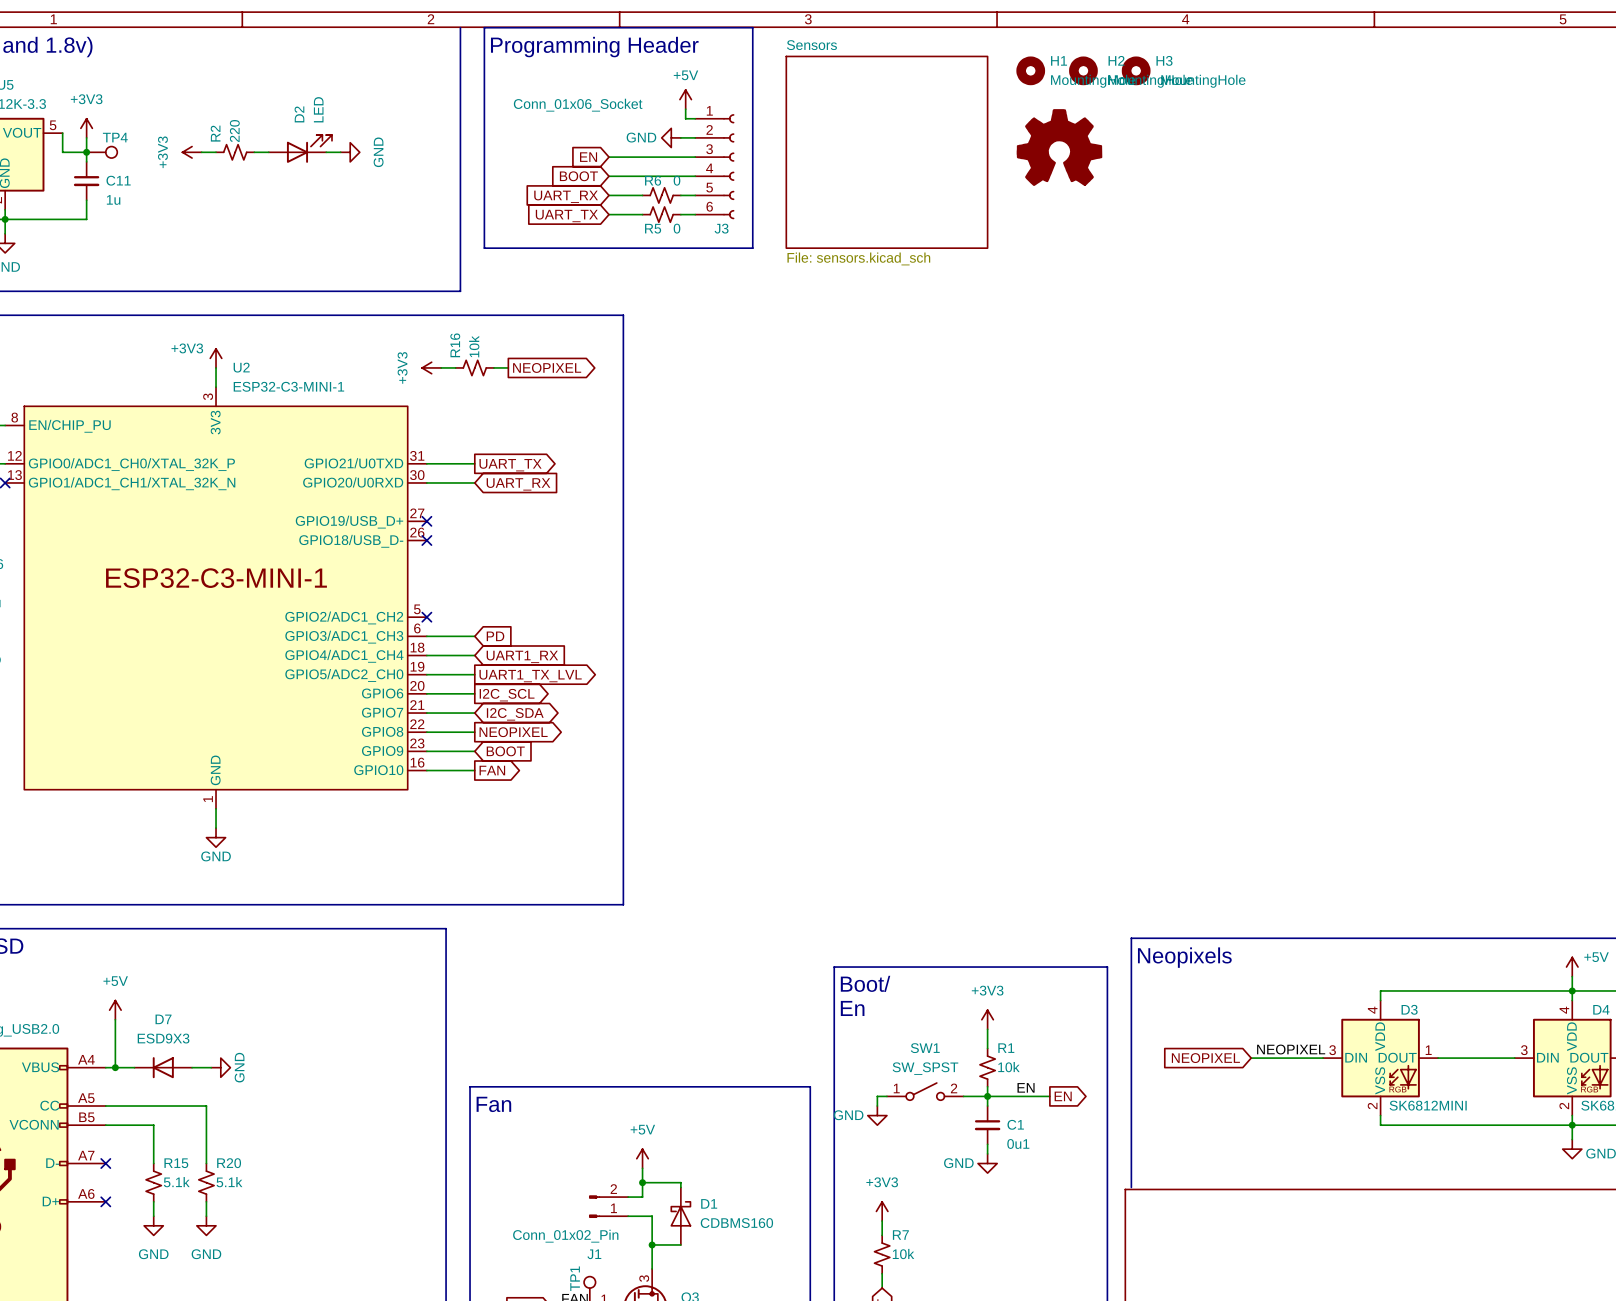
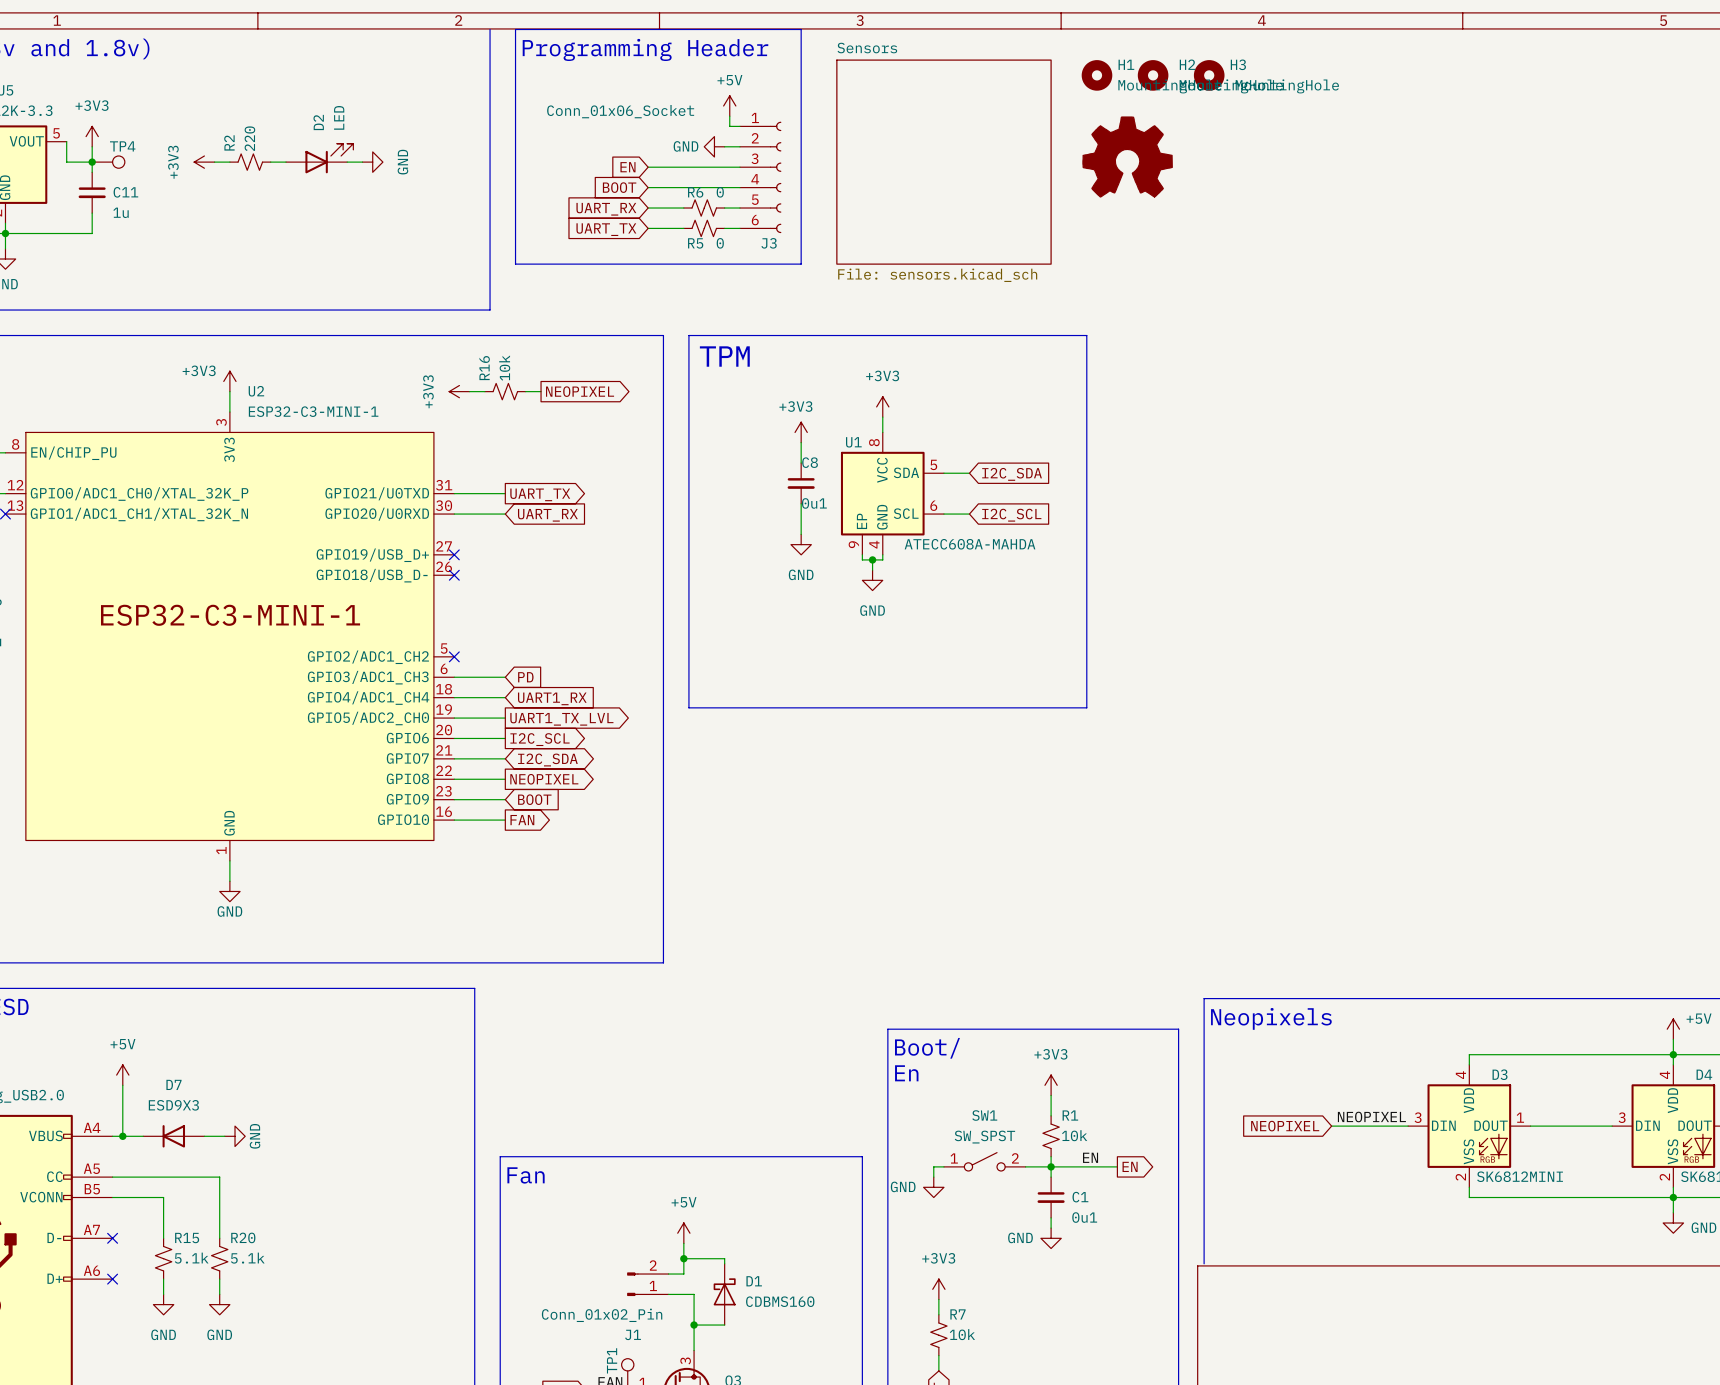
line: none -> (688, 335) (688, 707) (1086, 707) (1086, 335) (688, 335)
text: none -> TPM (724, 356)
power symbol: none -> +3V3 (882, 406)
wire: none -> (882, 417) (882, 432)
power symbol: none -> +3V3 (801, 432)
wire: none -> (801, 442) (801, 463)
wire: none -> (943, 473) (969, 473)
global label: none -> I2C_SDA (1012, 474)
C8: none -> 0u1 (801, 483)
U1: none -> ATECC608A-MAHDA (892, 493)
wire: none -> (801, 503) (801, 534)
wire: none -> (943, 514) (969, 514)
global label: none -> I2C_SCL (1011, 515)
power symbol: none -> GND (801, 544)
wire: none -> (862, 554) (862, 559) (882, 559) (882, 554)
wire: none -> (872, 559) (872, 570)
junction: none -> (872, 559)
power symbol: none -> GND (872, 580)

